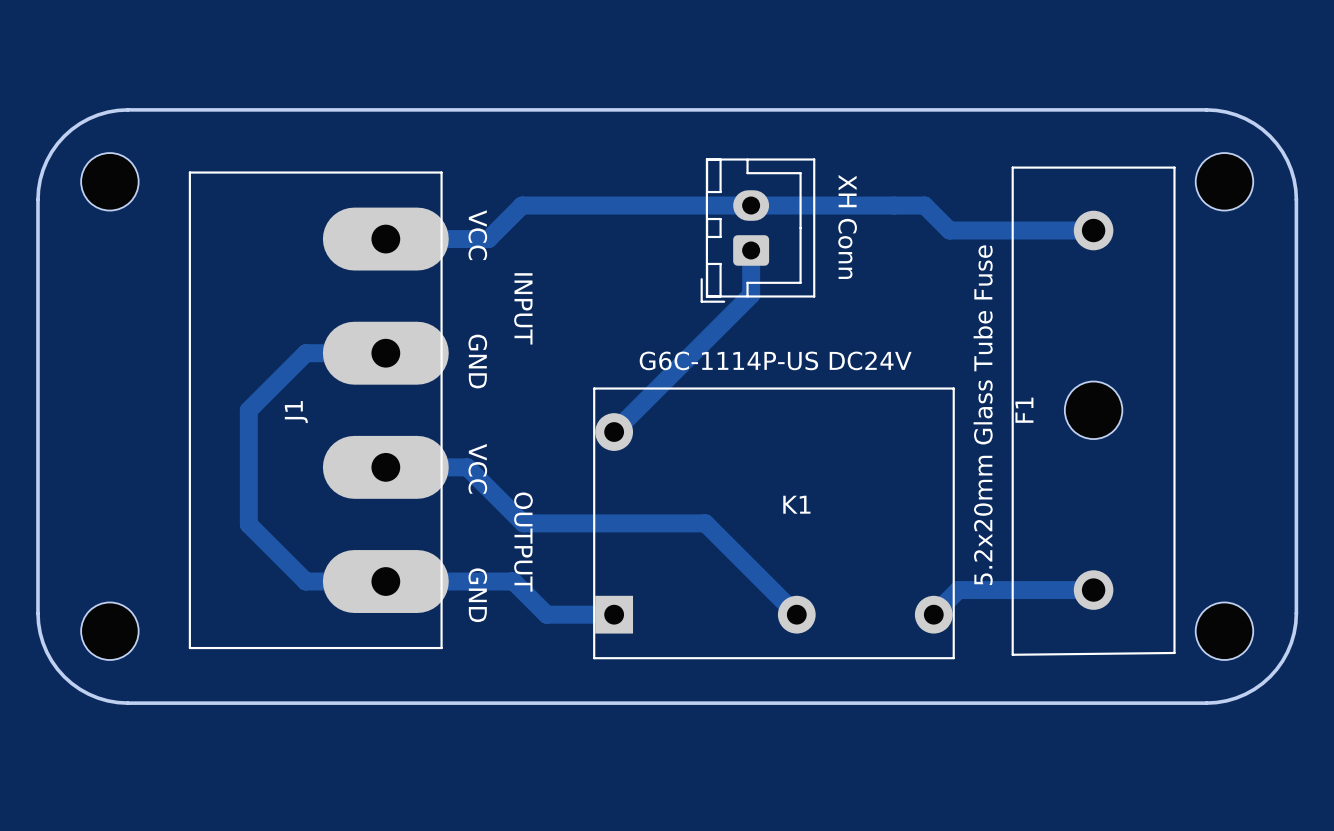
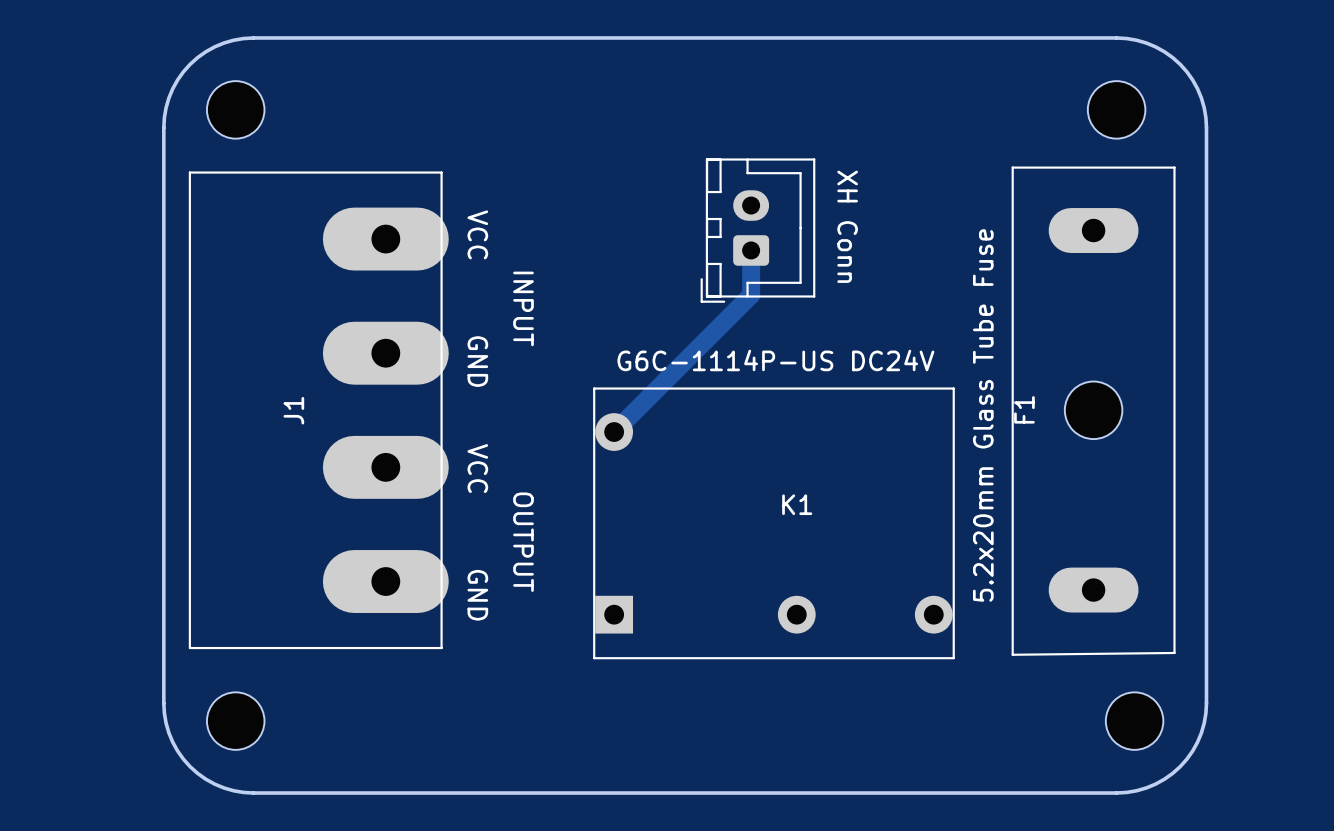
board edge: (127, 109) (1206, 109) (1226, 112) (1245, 118) (1262, 129) (1276, 143) (1291, 170) (1295, 189) (1296, 613) (1294, 633) (1287, 652) (1270, 676) (1254, 689) (1226, 700) (1206, 703) (127, 703) (107, 700) (88, 694) (64, 676) (51, 661) (43, 642) (38, 623) (38, 189) (46, 160) (64, 136) (80, 123) (98, 114) (127, 109) -> (253, 37) (224, 43) (205, 51) (190, 64) (172, 88) (164, 117) (163, 703) (166, 723) (172, 742) (183, 759) (197, 773) (224, 787) (253, 793) (1116, 793) (1136, 790) (1155, 784) (1172, 773) (1186, 759) (1201, 732) (1206, 703) (1206, 127) (1204, 107) (1197, 88) (1186, 71) (1172, 57) (1146, 43) (1116, 37) (253, 37)
F1 footprint: [1011, 166, 1176, 656] -> [1011, 166, 1176, 656]
part position: (109, 181) -> (235, 109)
part position: (1224, 181) -> (1116, 109)
track: (1093, 230) (949, 230) (924, 205) (522, 205) (488, 239) (385, 239) -> none
track: (385, 353) (305, 353) (248, 410) (248, 524) (305, 581) (513, 581) (546, 614) (614, 614) -> none
track: (385, 467) (467, 467) (523, 523) (705, 523) (796, 614) -> none
track: (1093, 590) (958, 590) (933, 614) -> none
part position: (109, 631) -> (235, 721)
part position: (1224, 631) -> (1134, 721)

